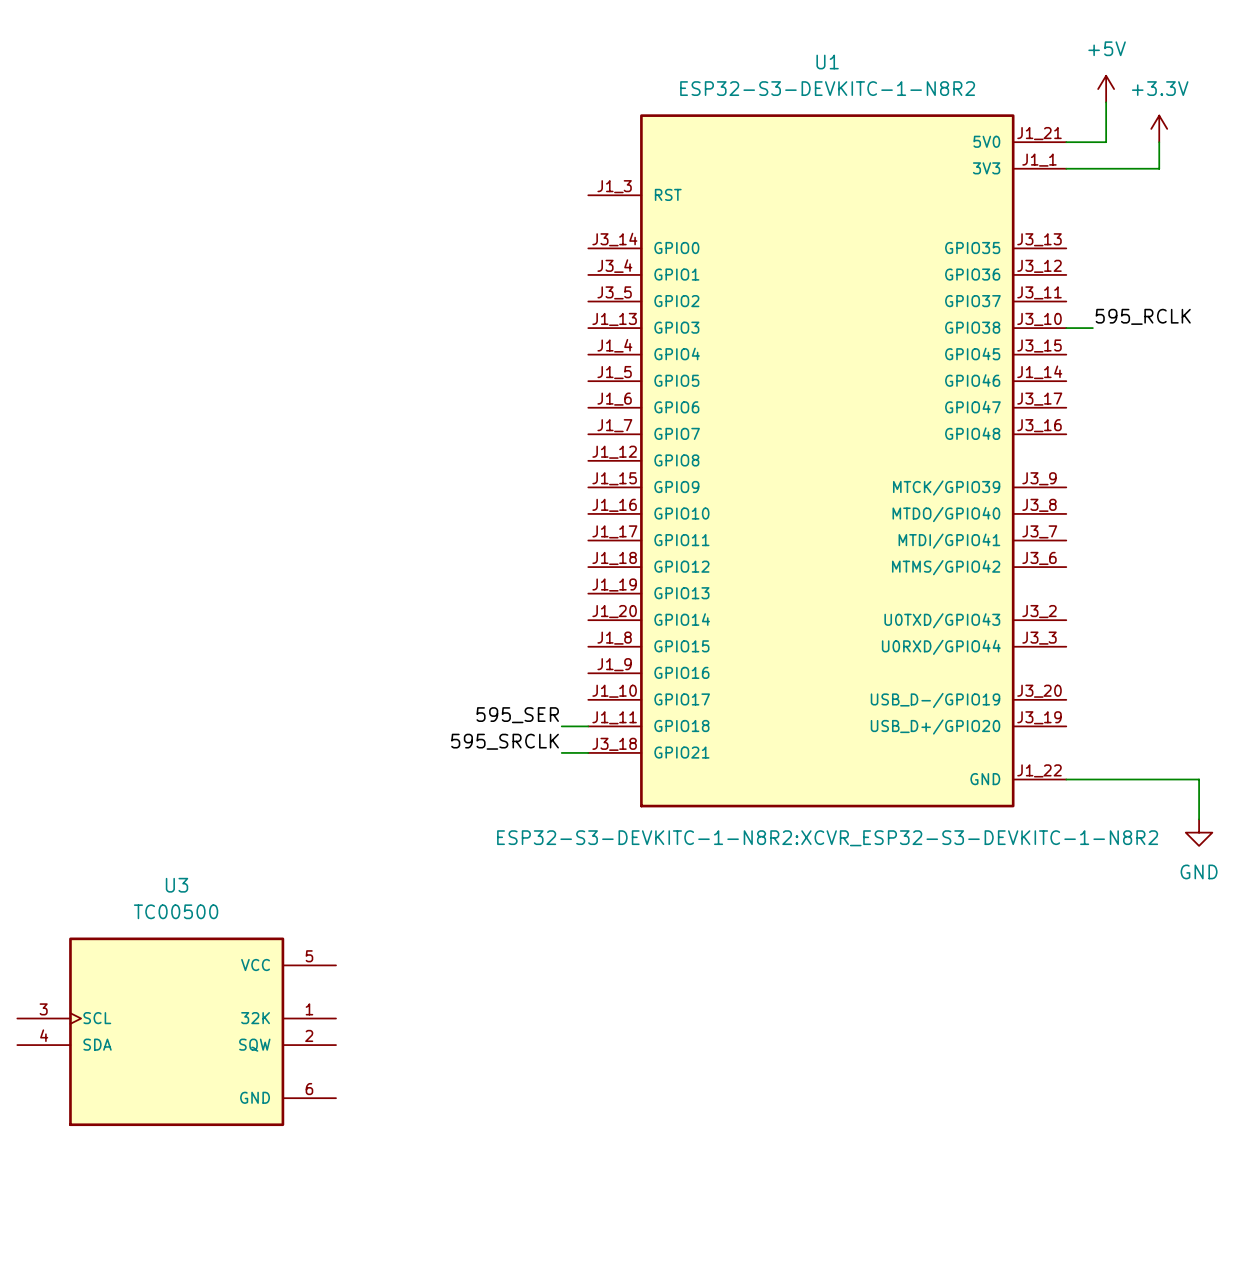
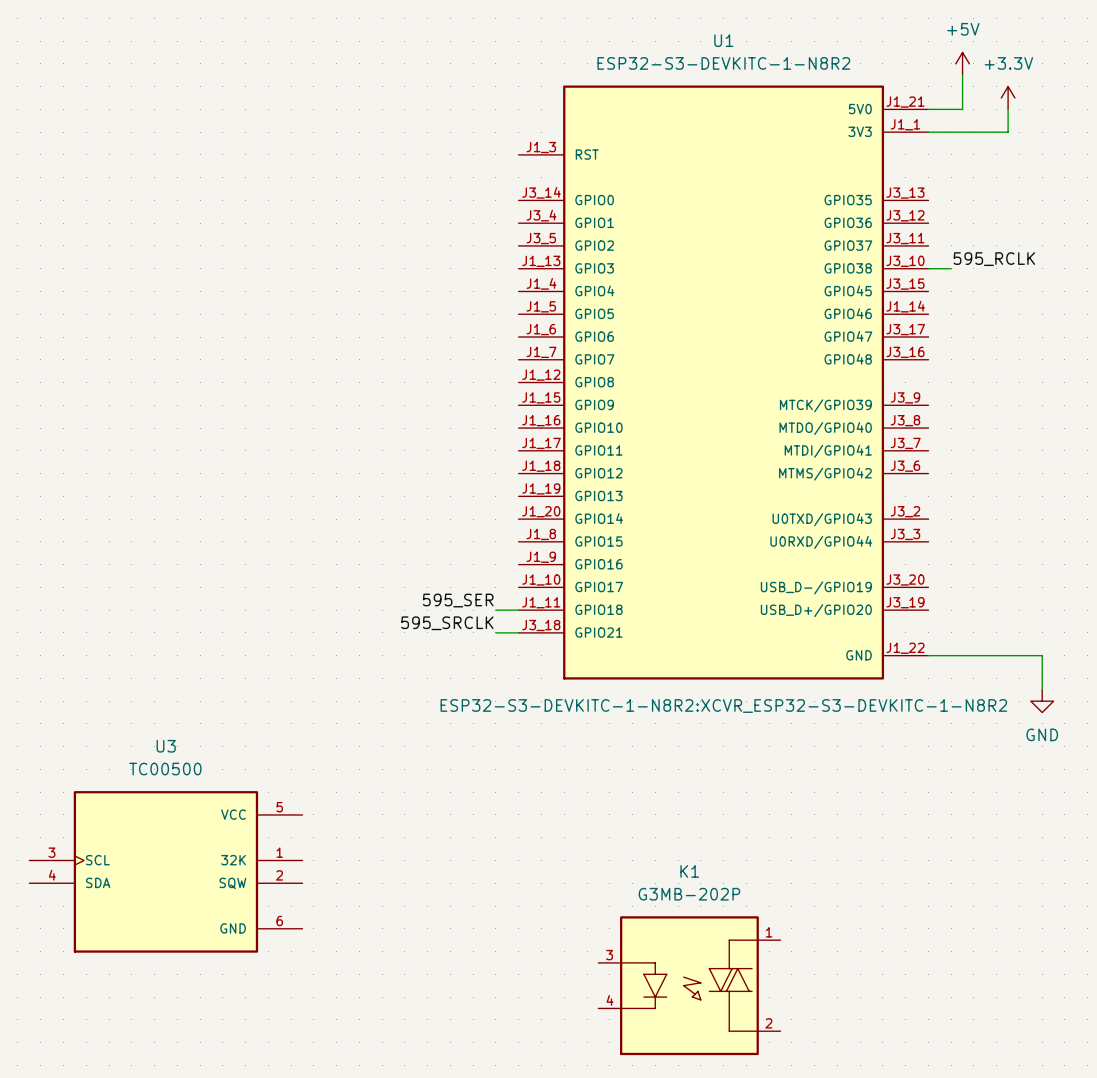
K1: none -> G3MB-202P (689, 985)

